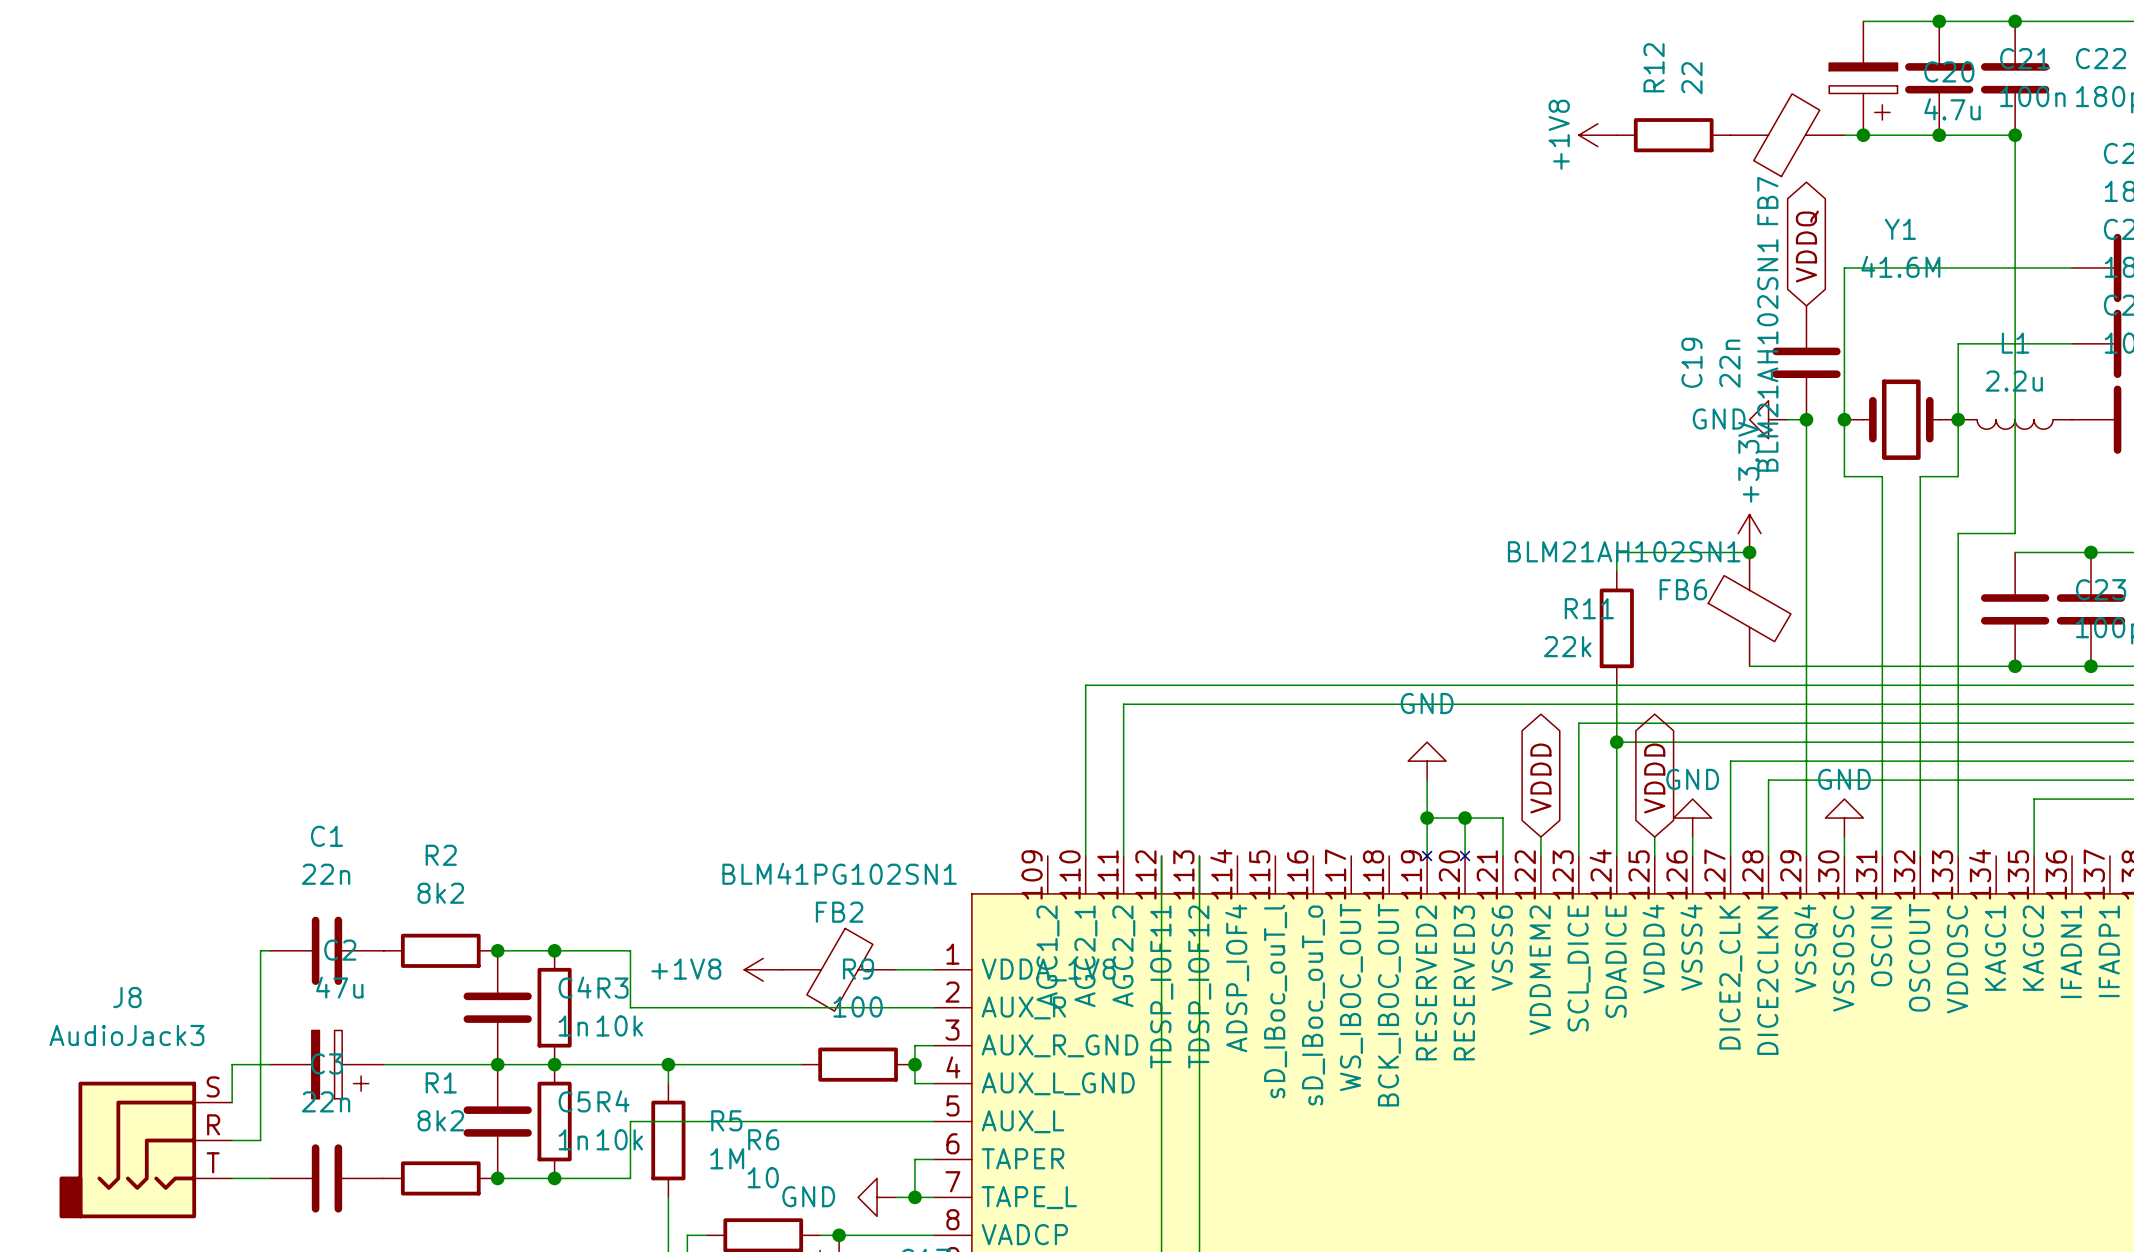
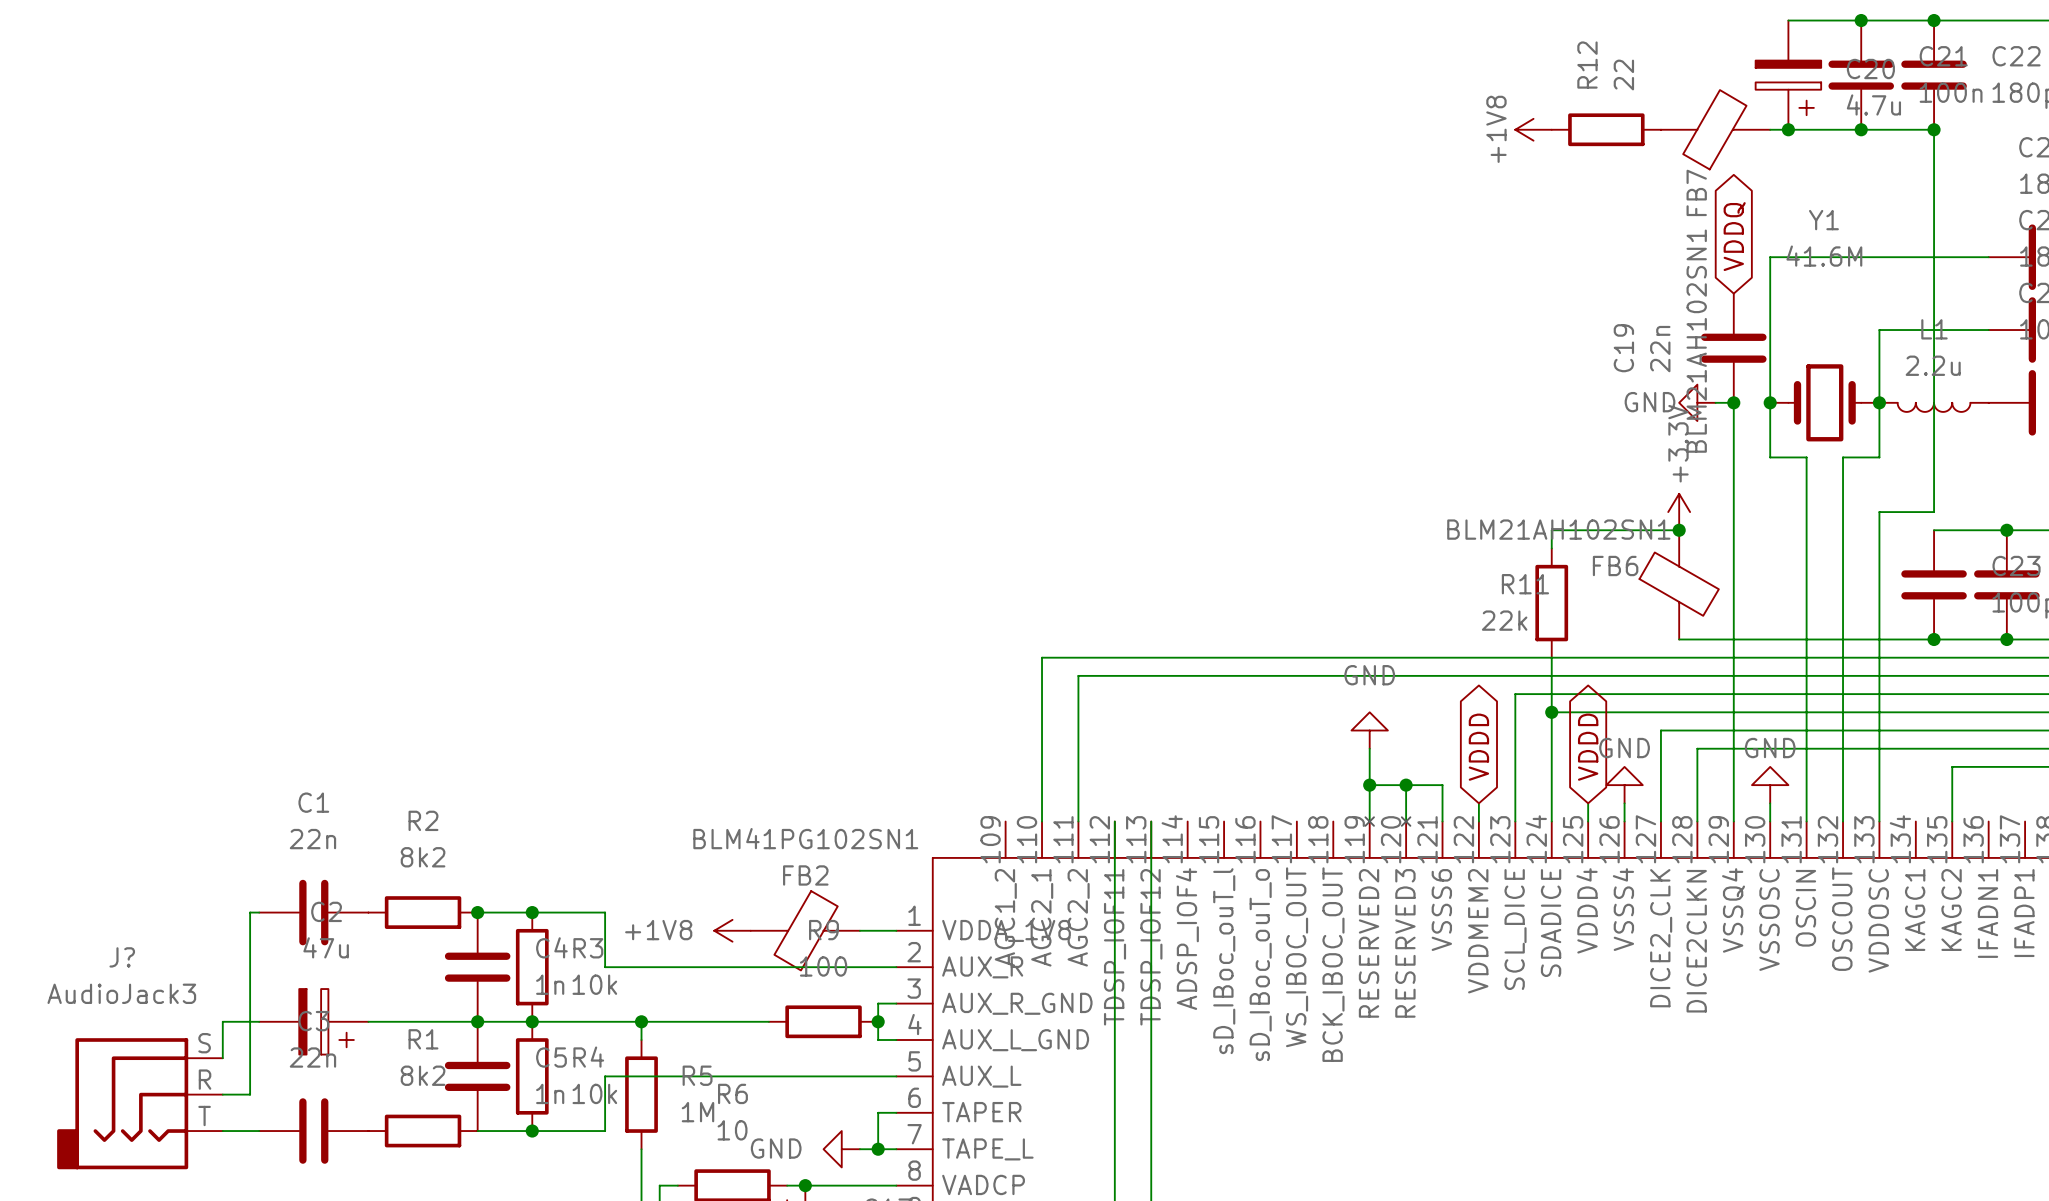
J8 name: J8 (127, 997) -> J? (122, 957)
junction: (497, 1178) -> none

